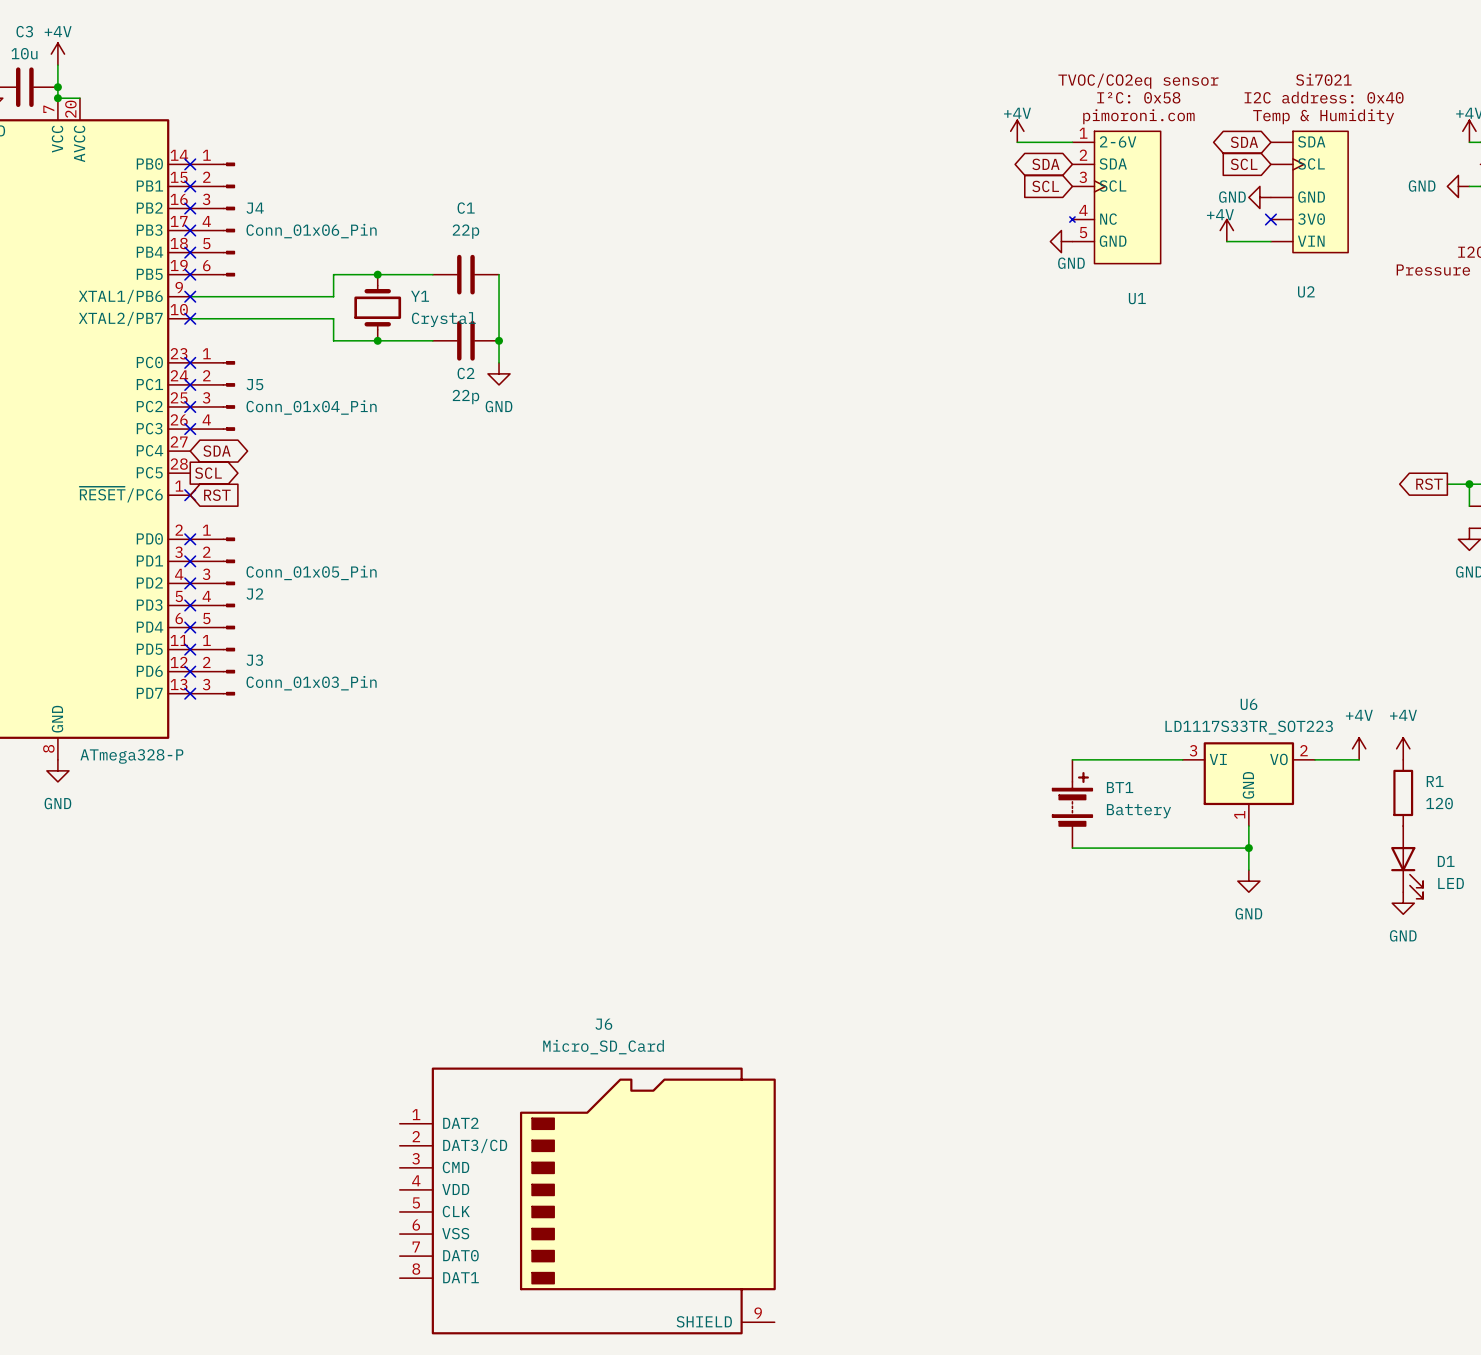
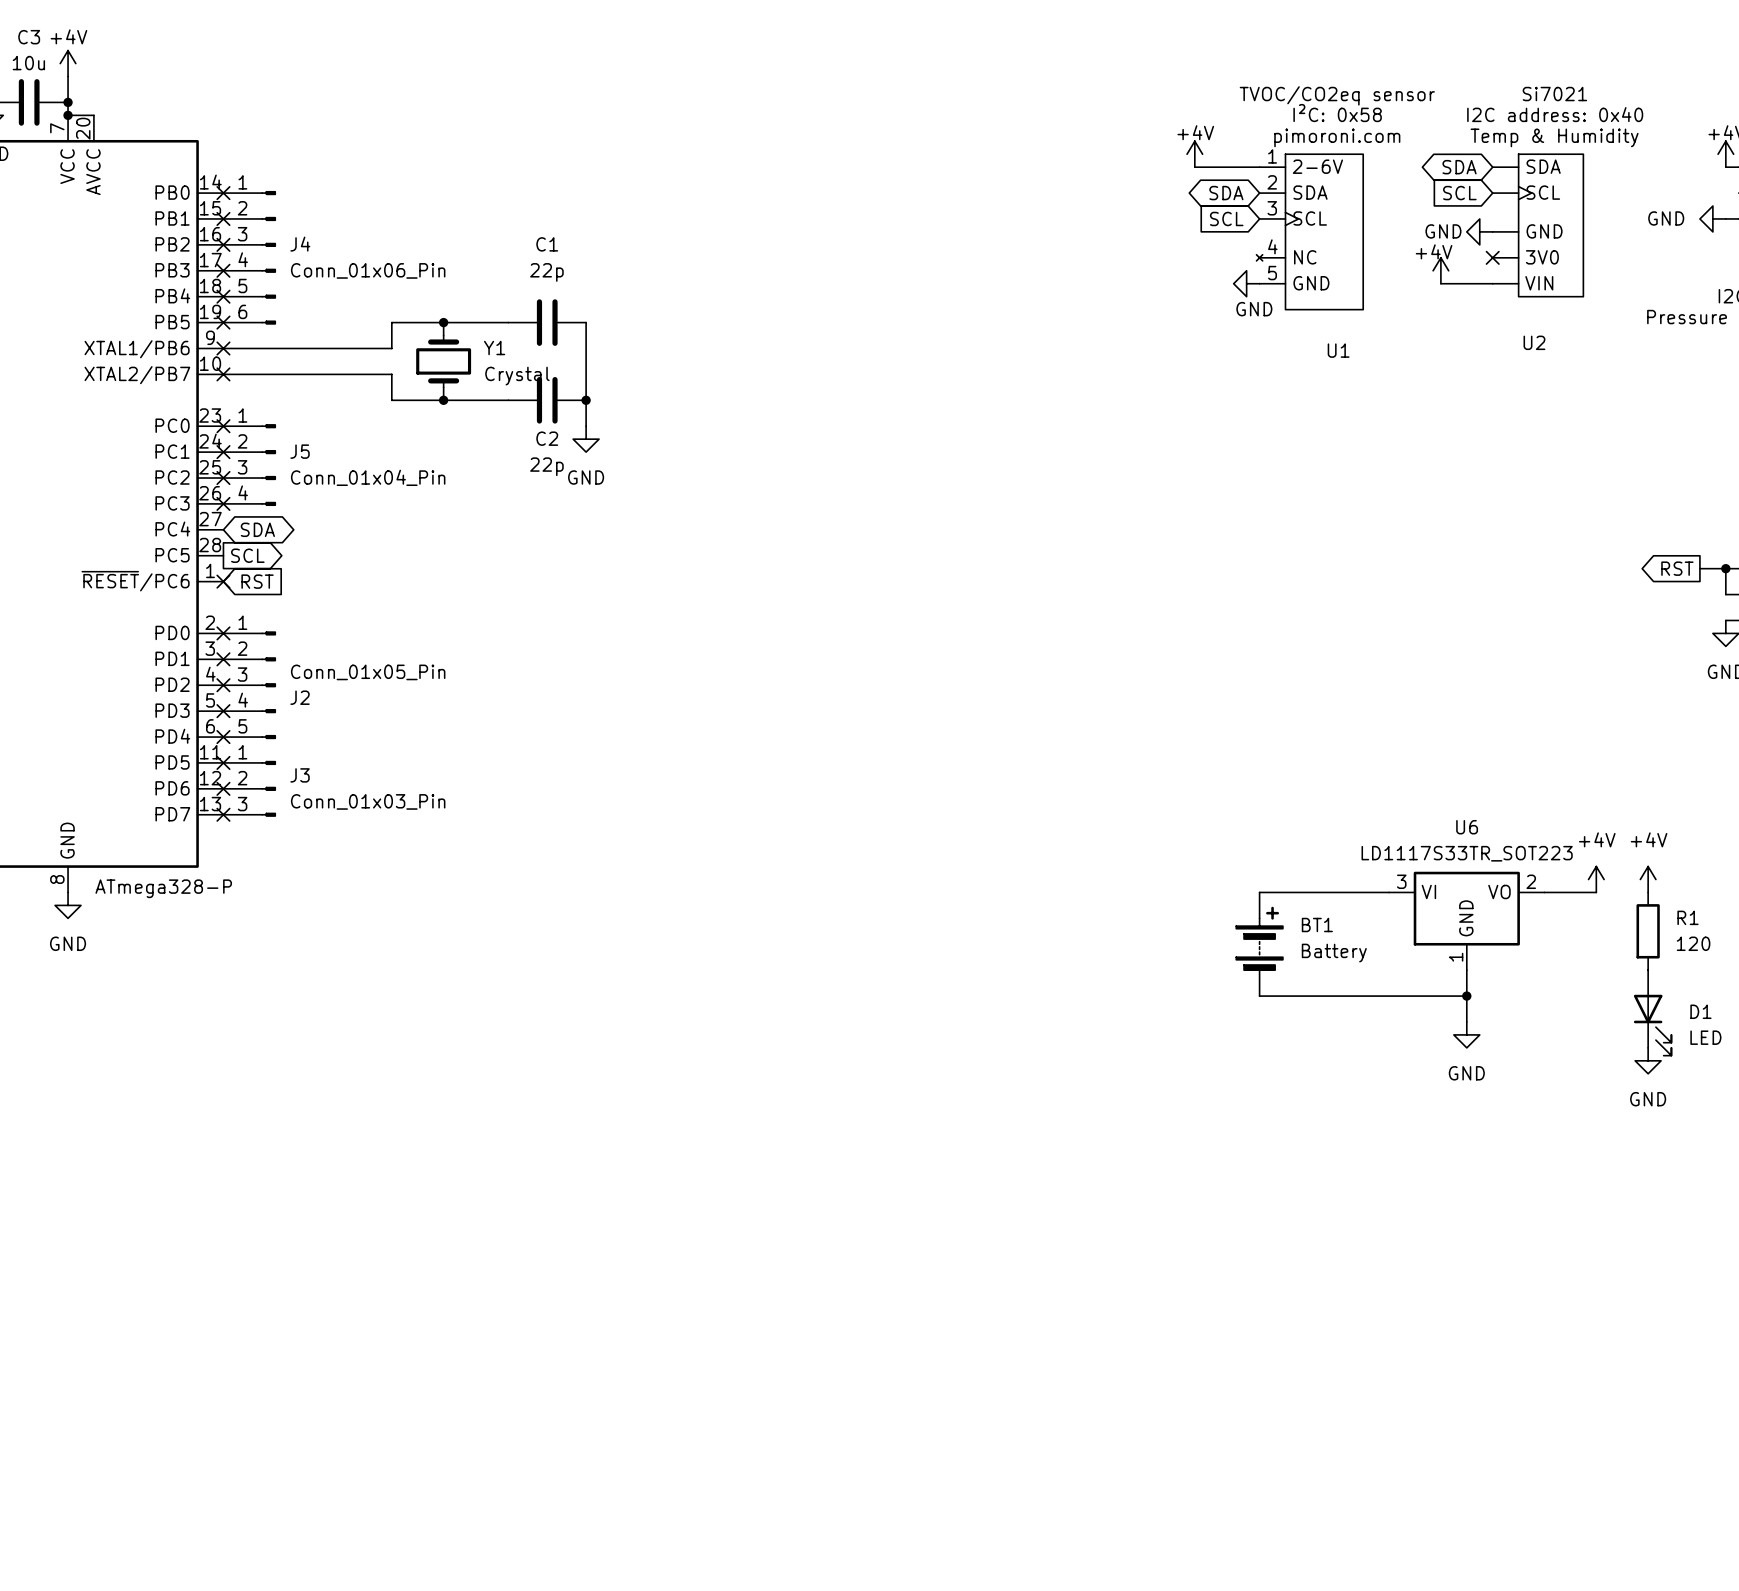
J6: Micro_SD_Card (587, 1200) -> none

